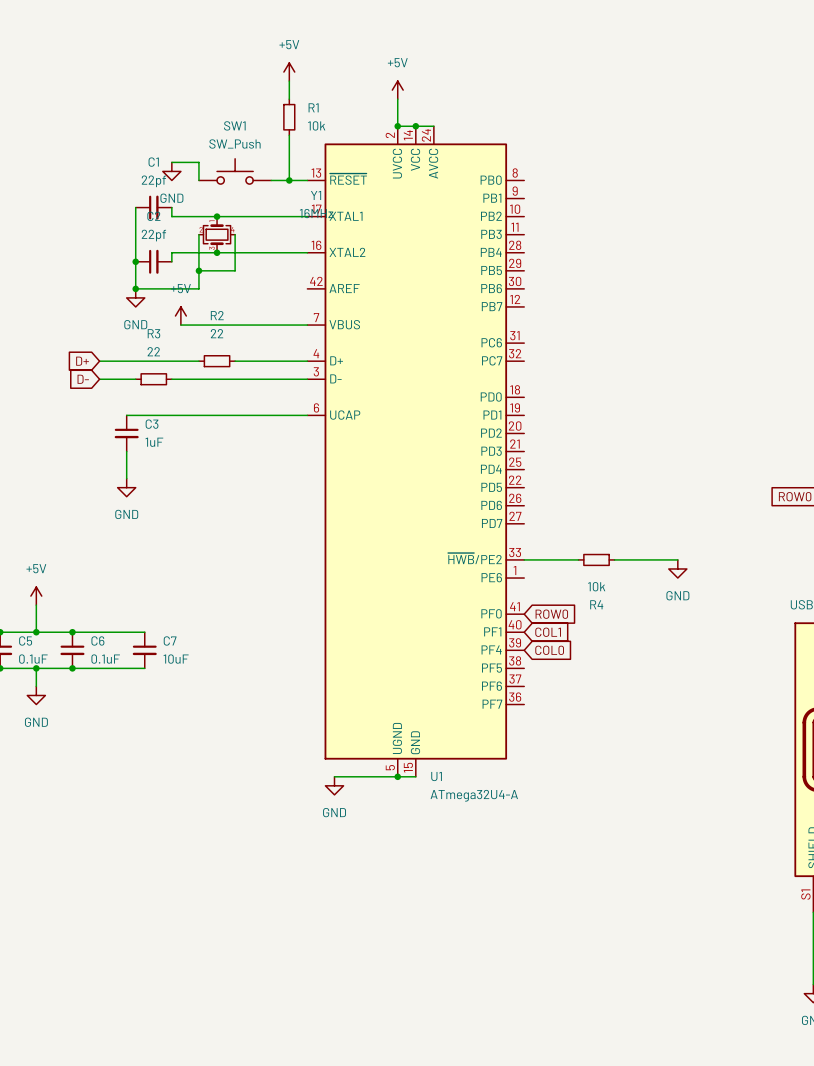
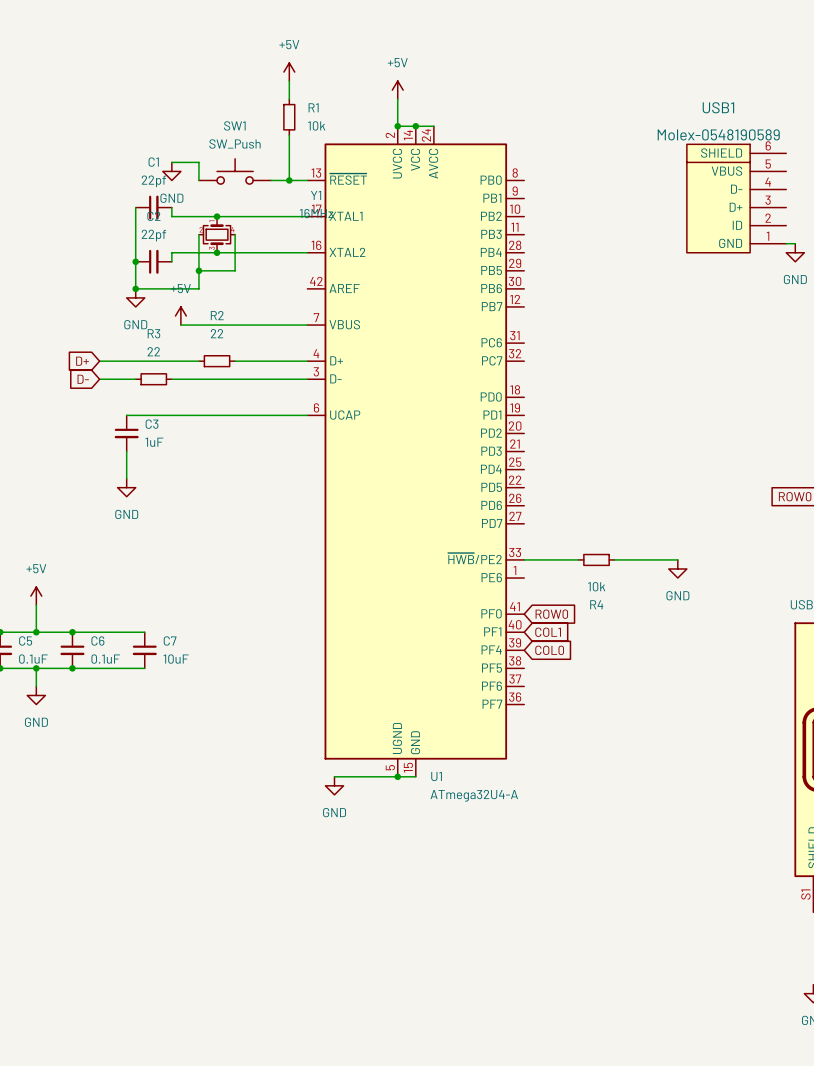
USB1: none -> Molex-0548190589 (736, 198)
wire: none -> (786, 243) (795, 243)
power symbol: none -> GND (795, 252)
wire: (813, 912) (813, 984) -> none

